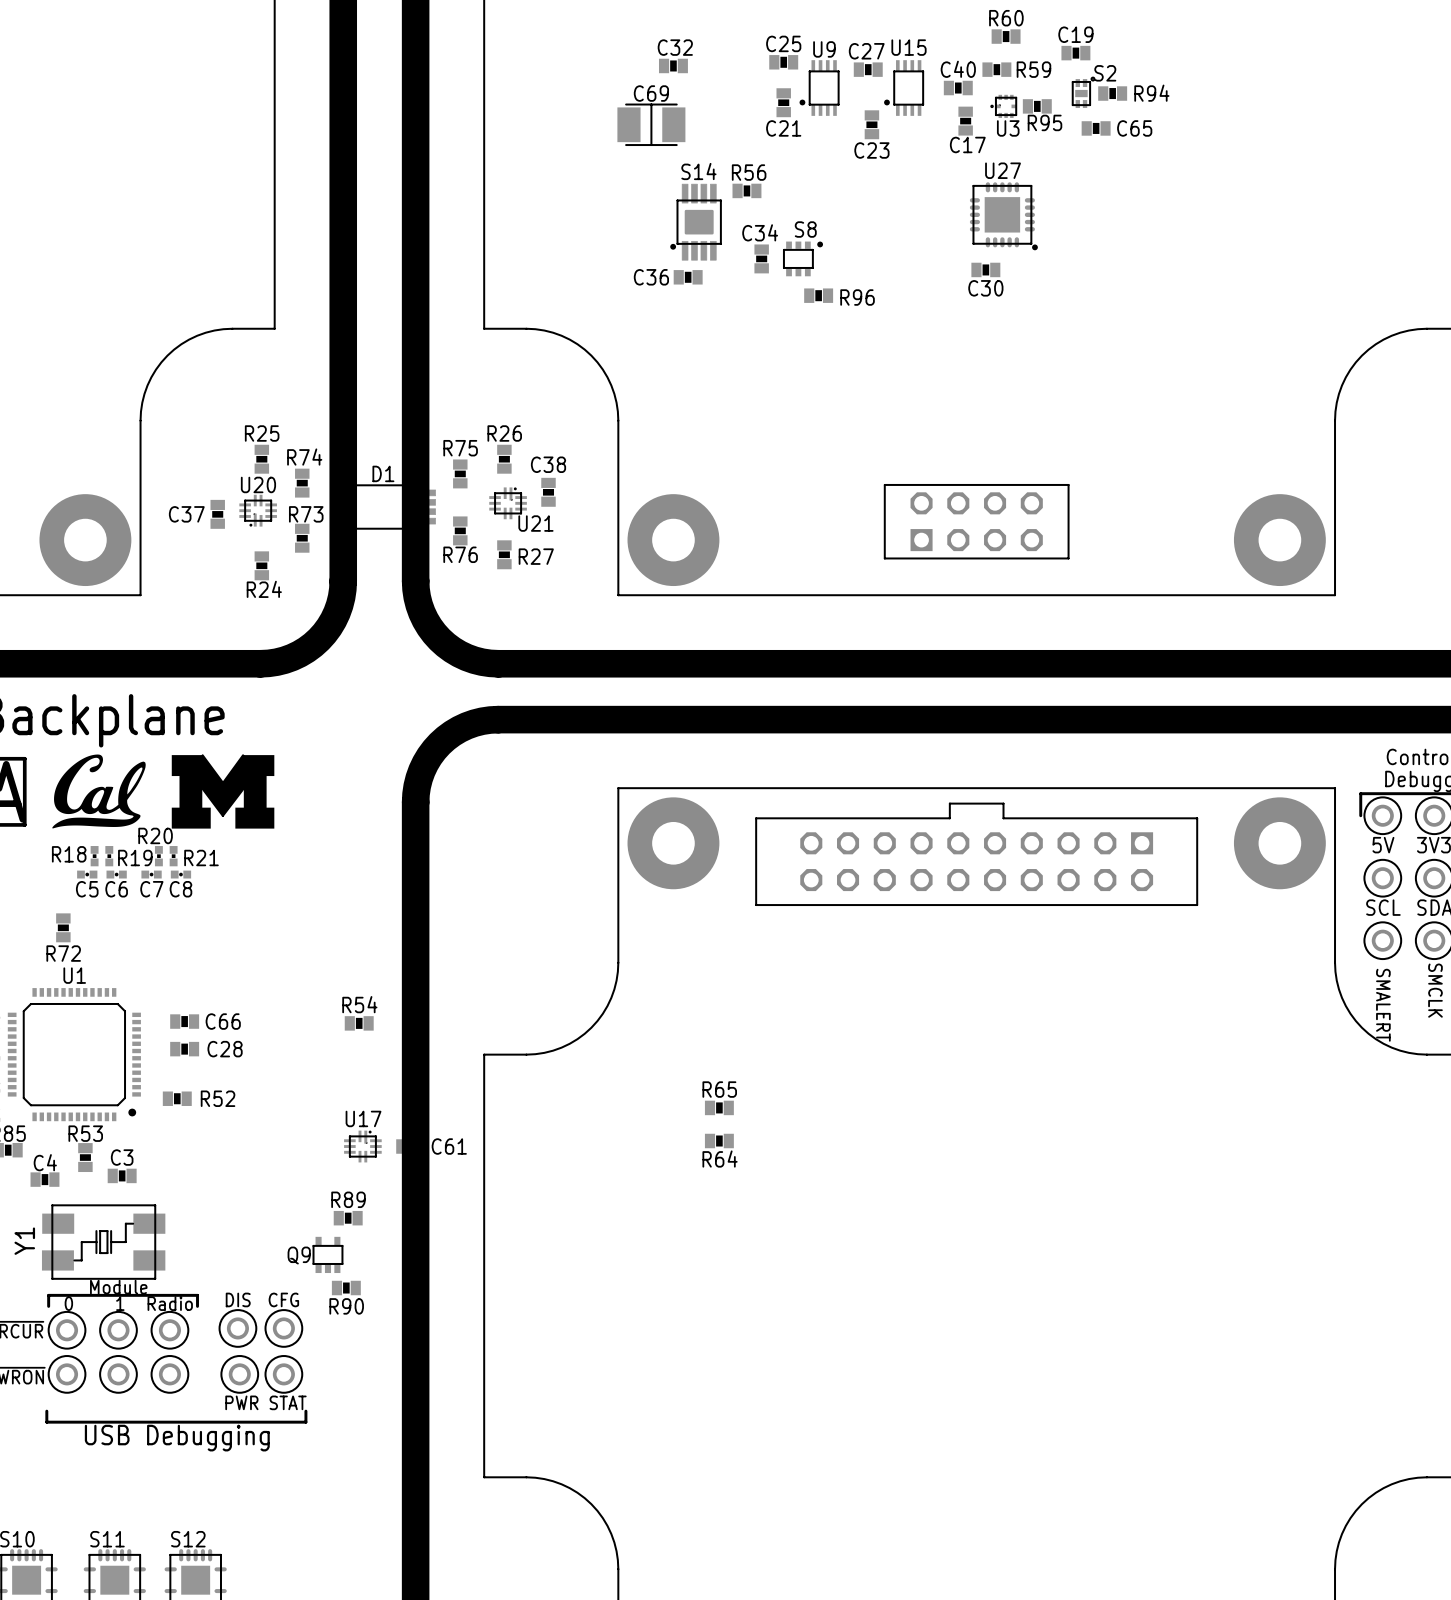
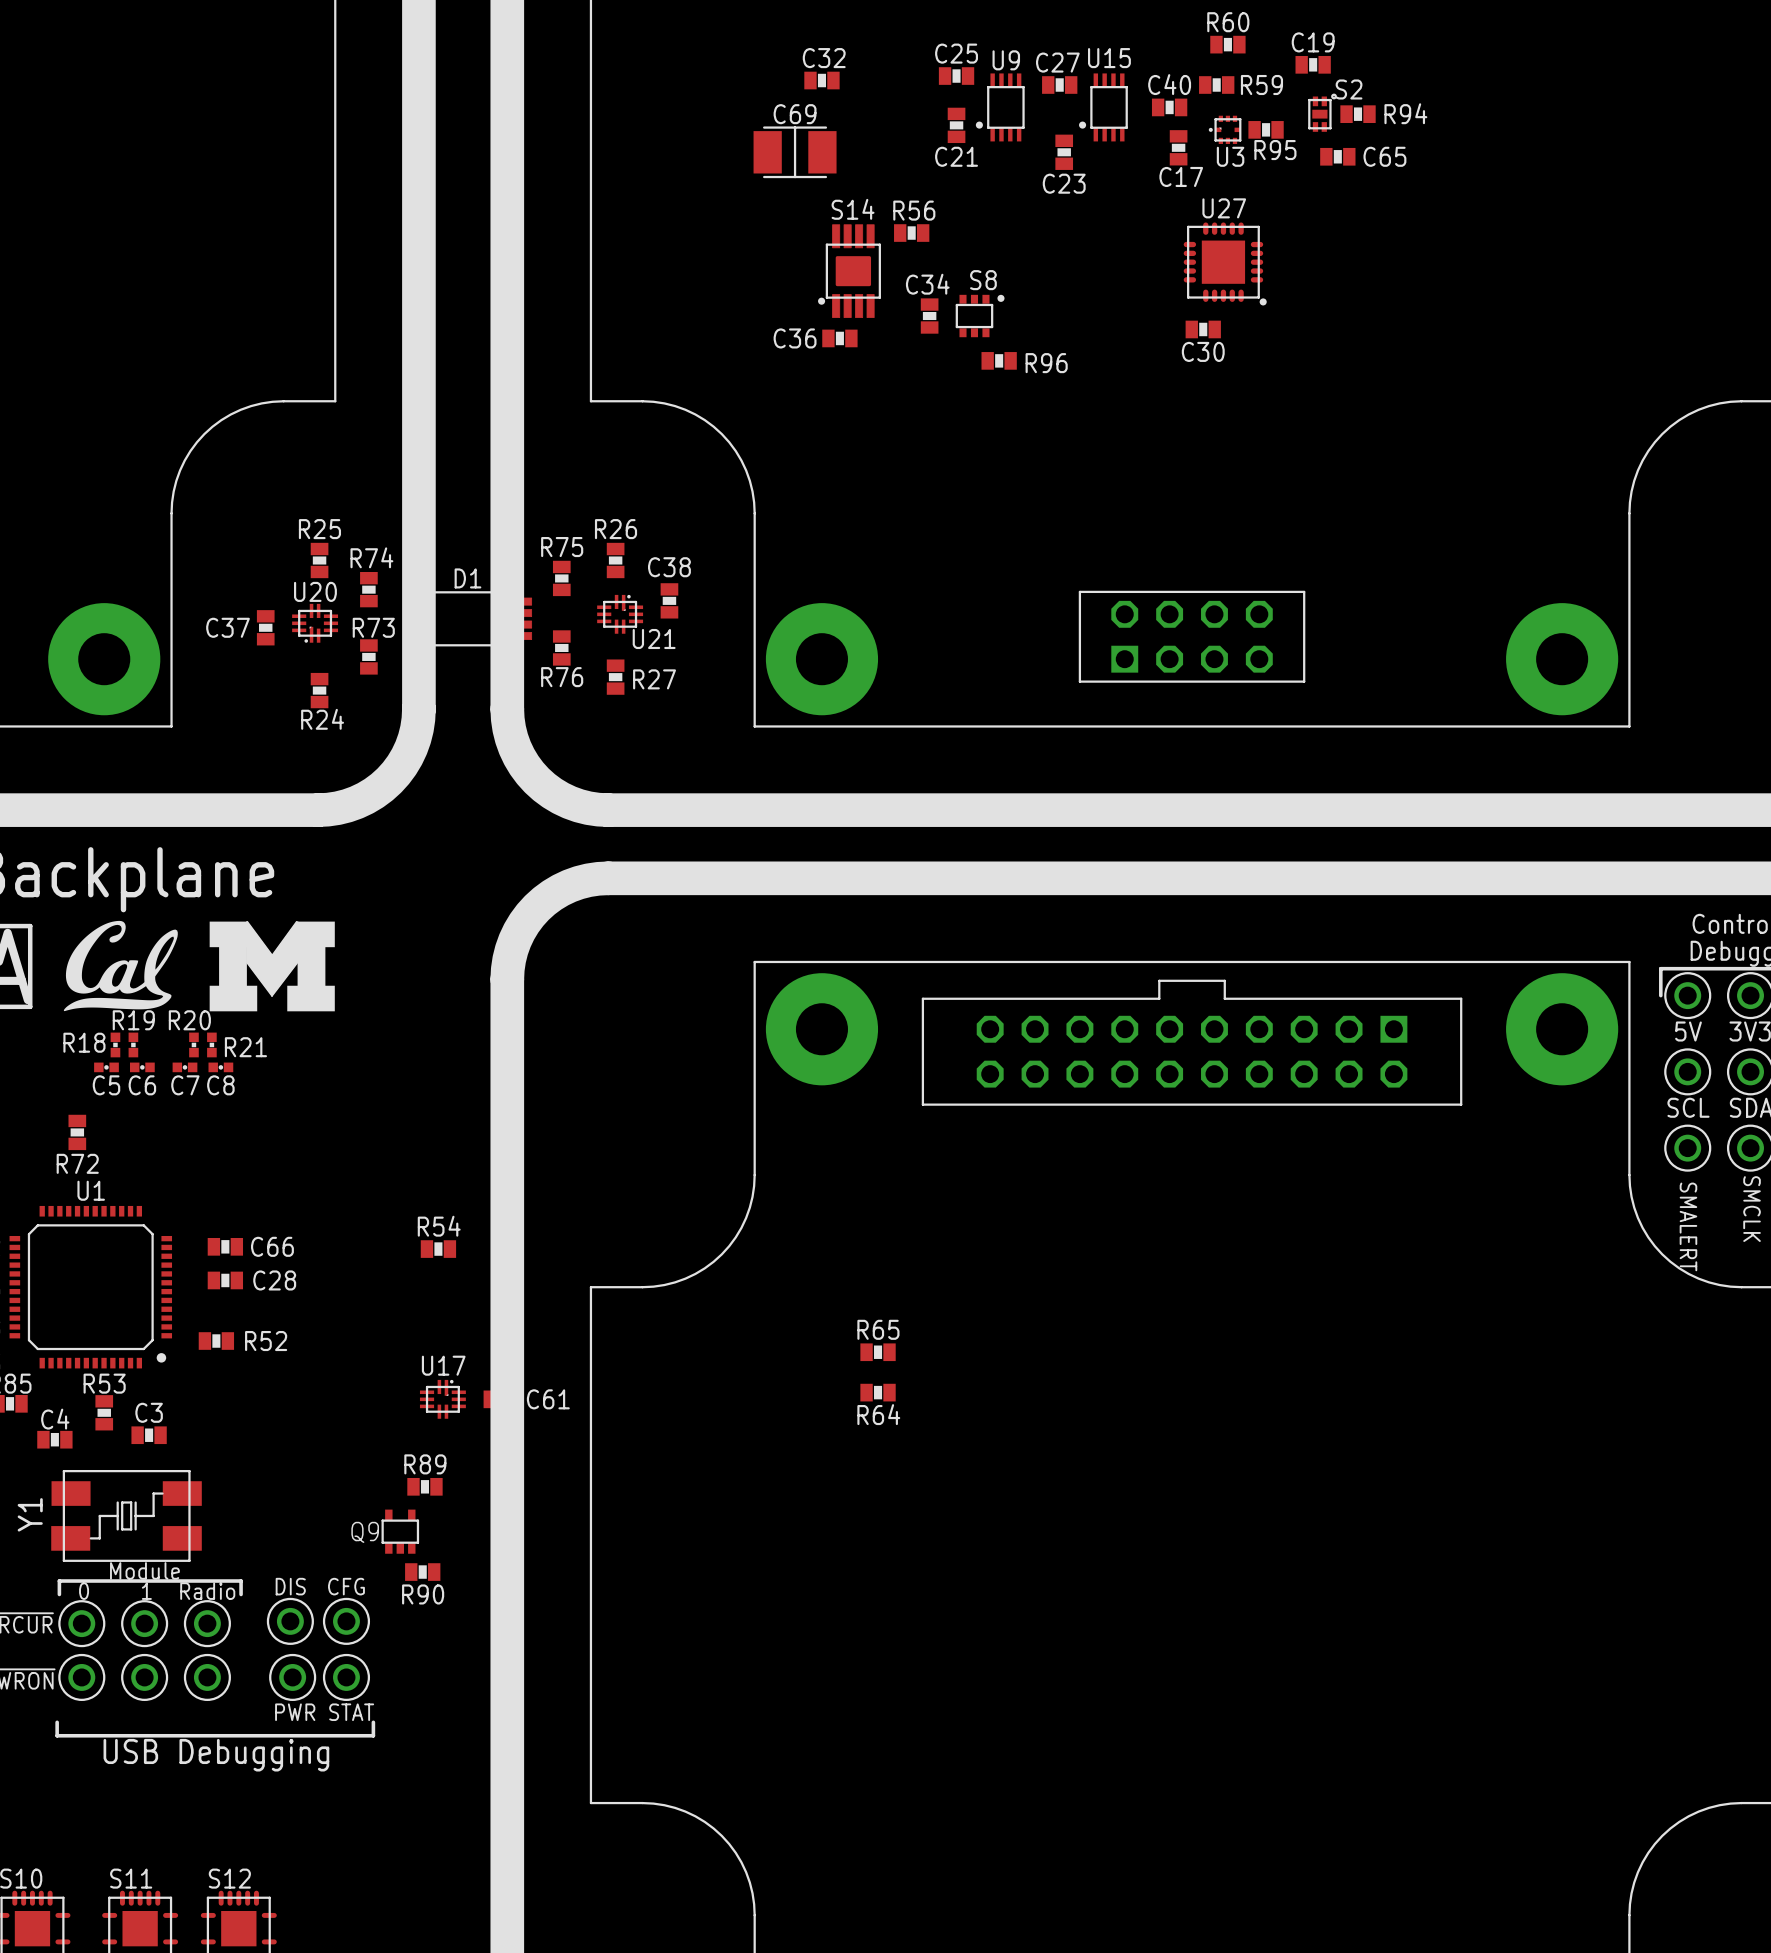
R19 name position: R19 (135, 858) -> R19 (133, 1020)

